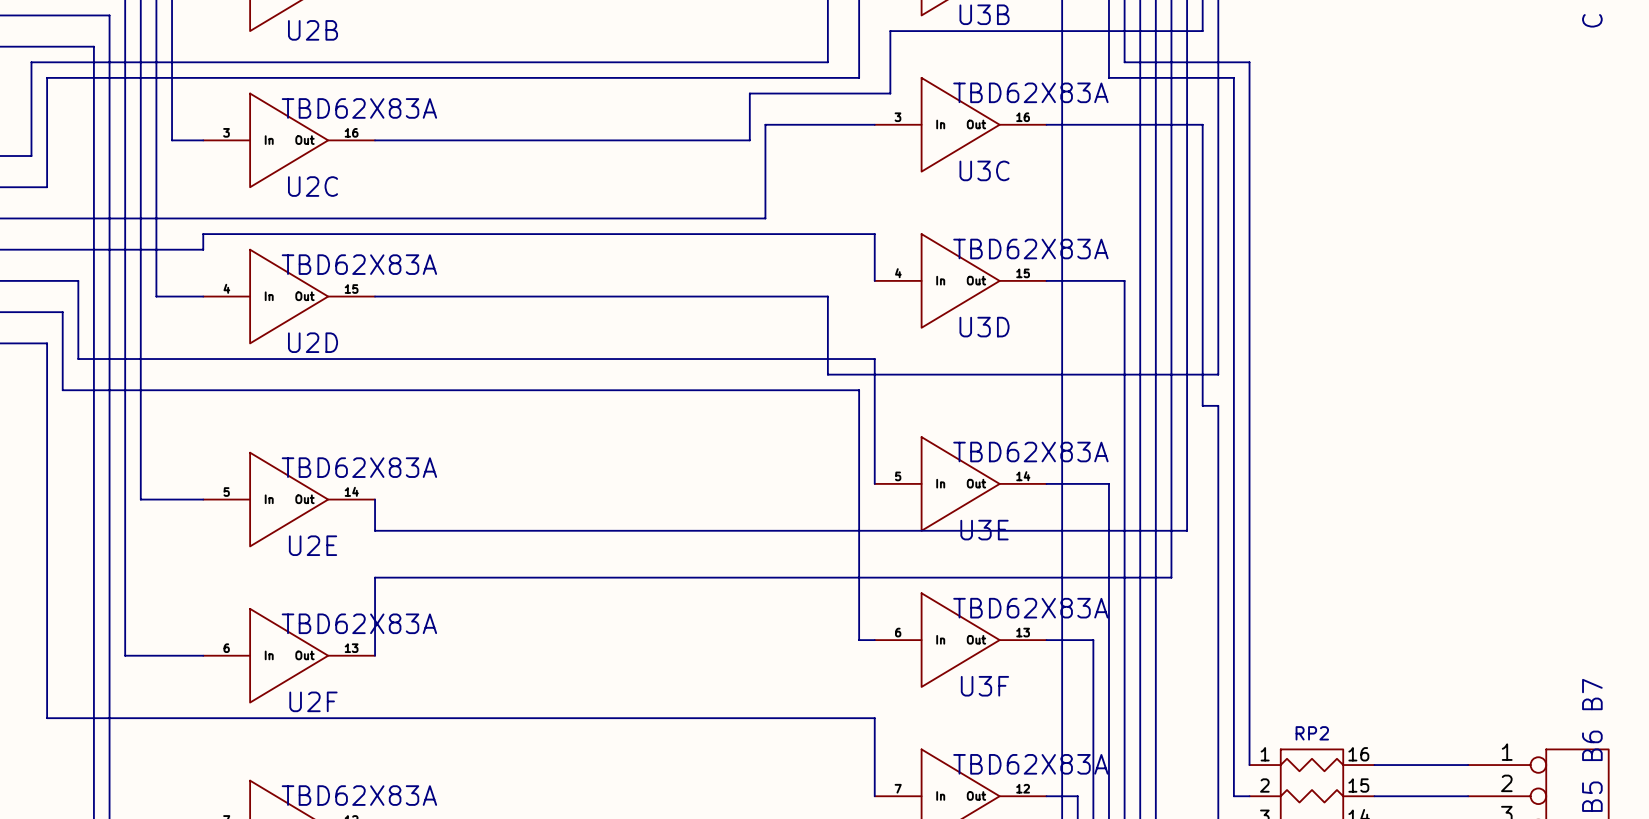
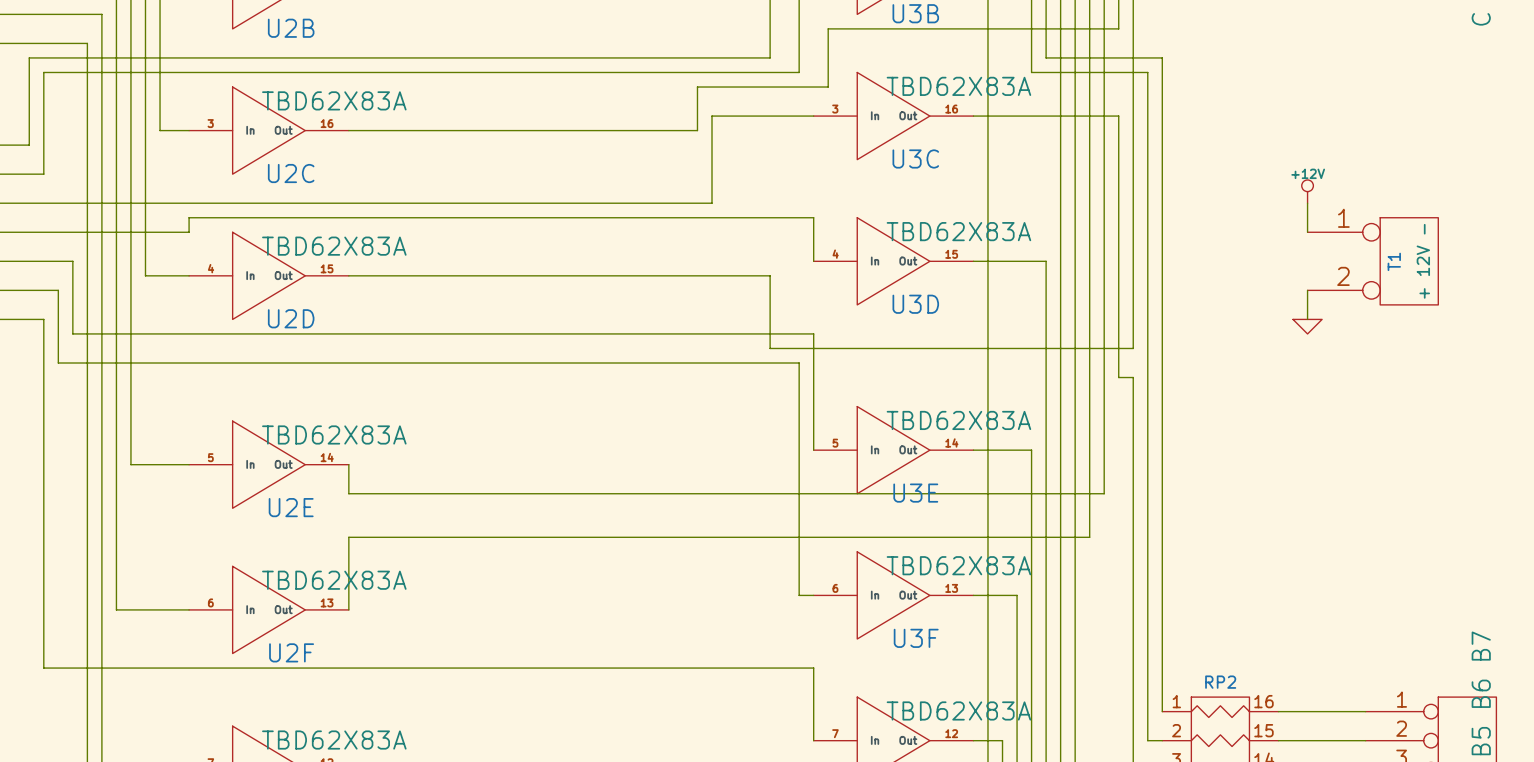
power symbol: none -> +12V (1307, 191)
wire: none -> (1307, 203) (1307, 232)
T1: none -> + 12V - (1372, 261)
wire: none -> (1307, 290) (1307, 319)
power symbol: none -> (1307, 326)

